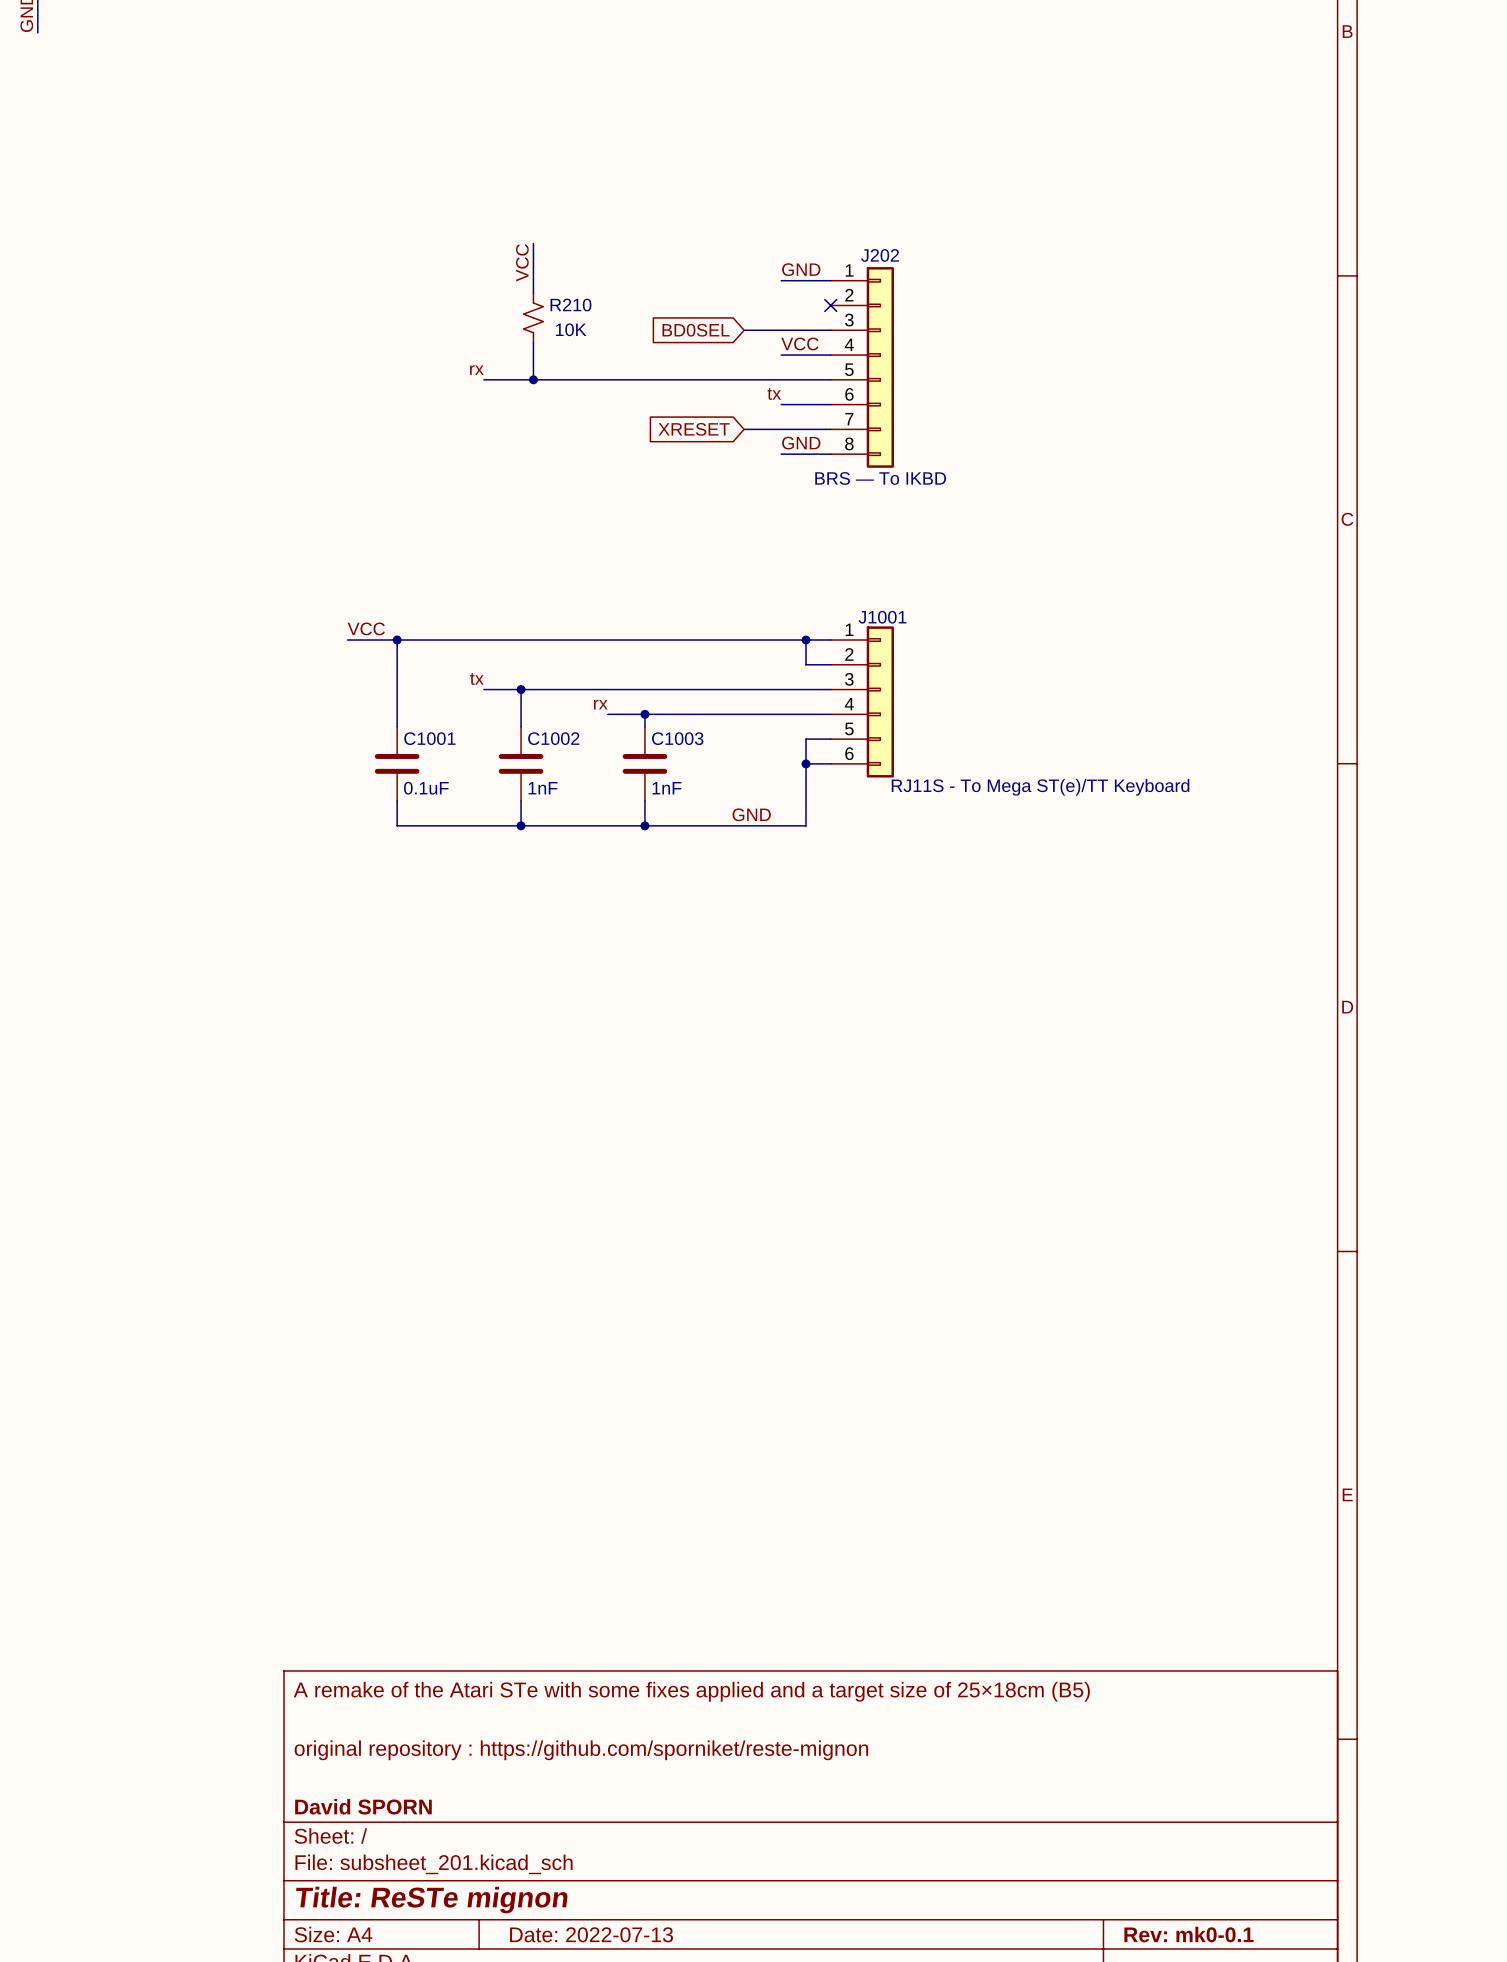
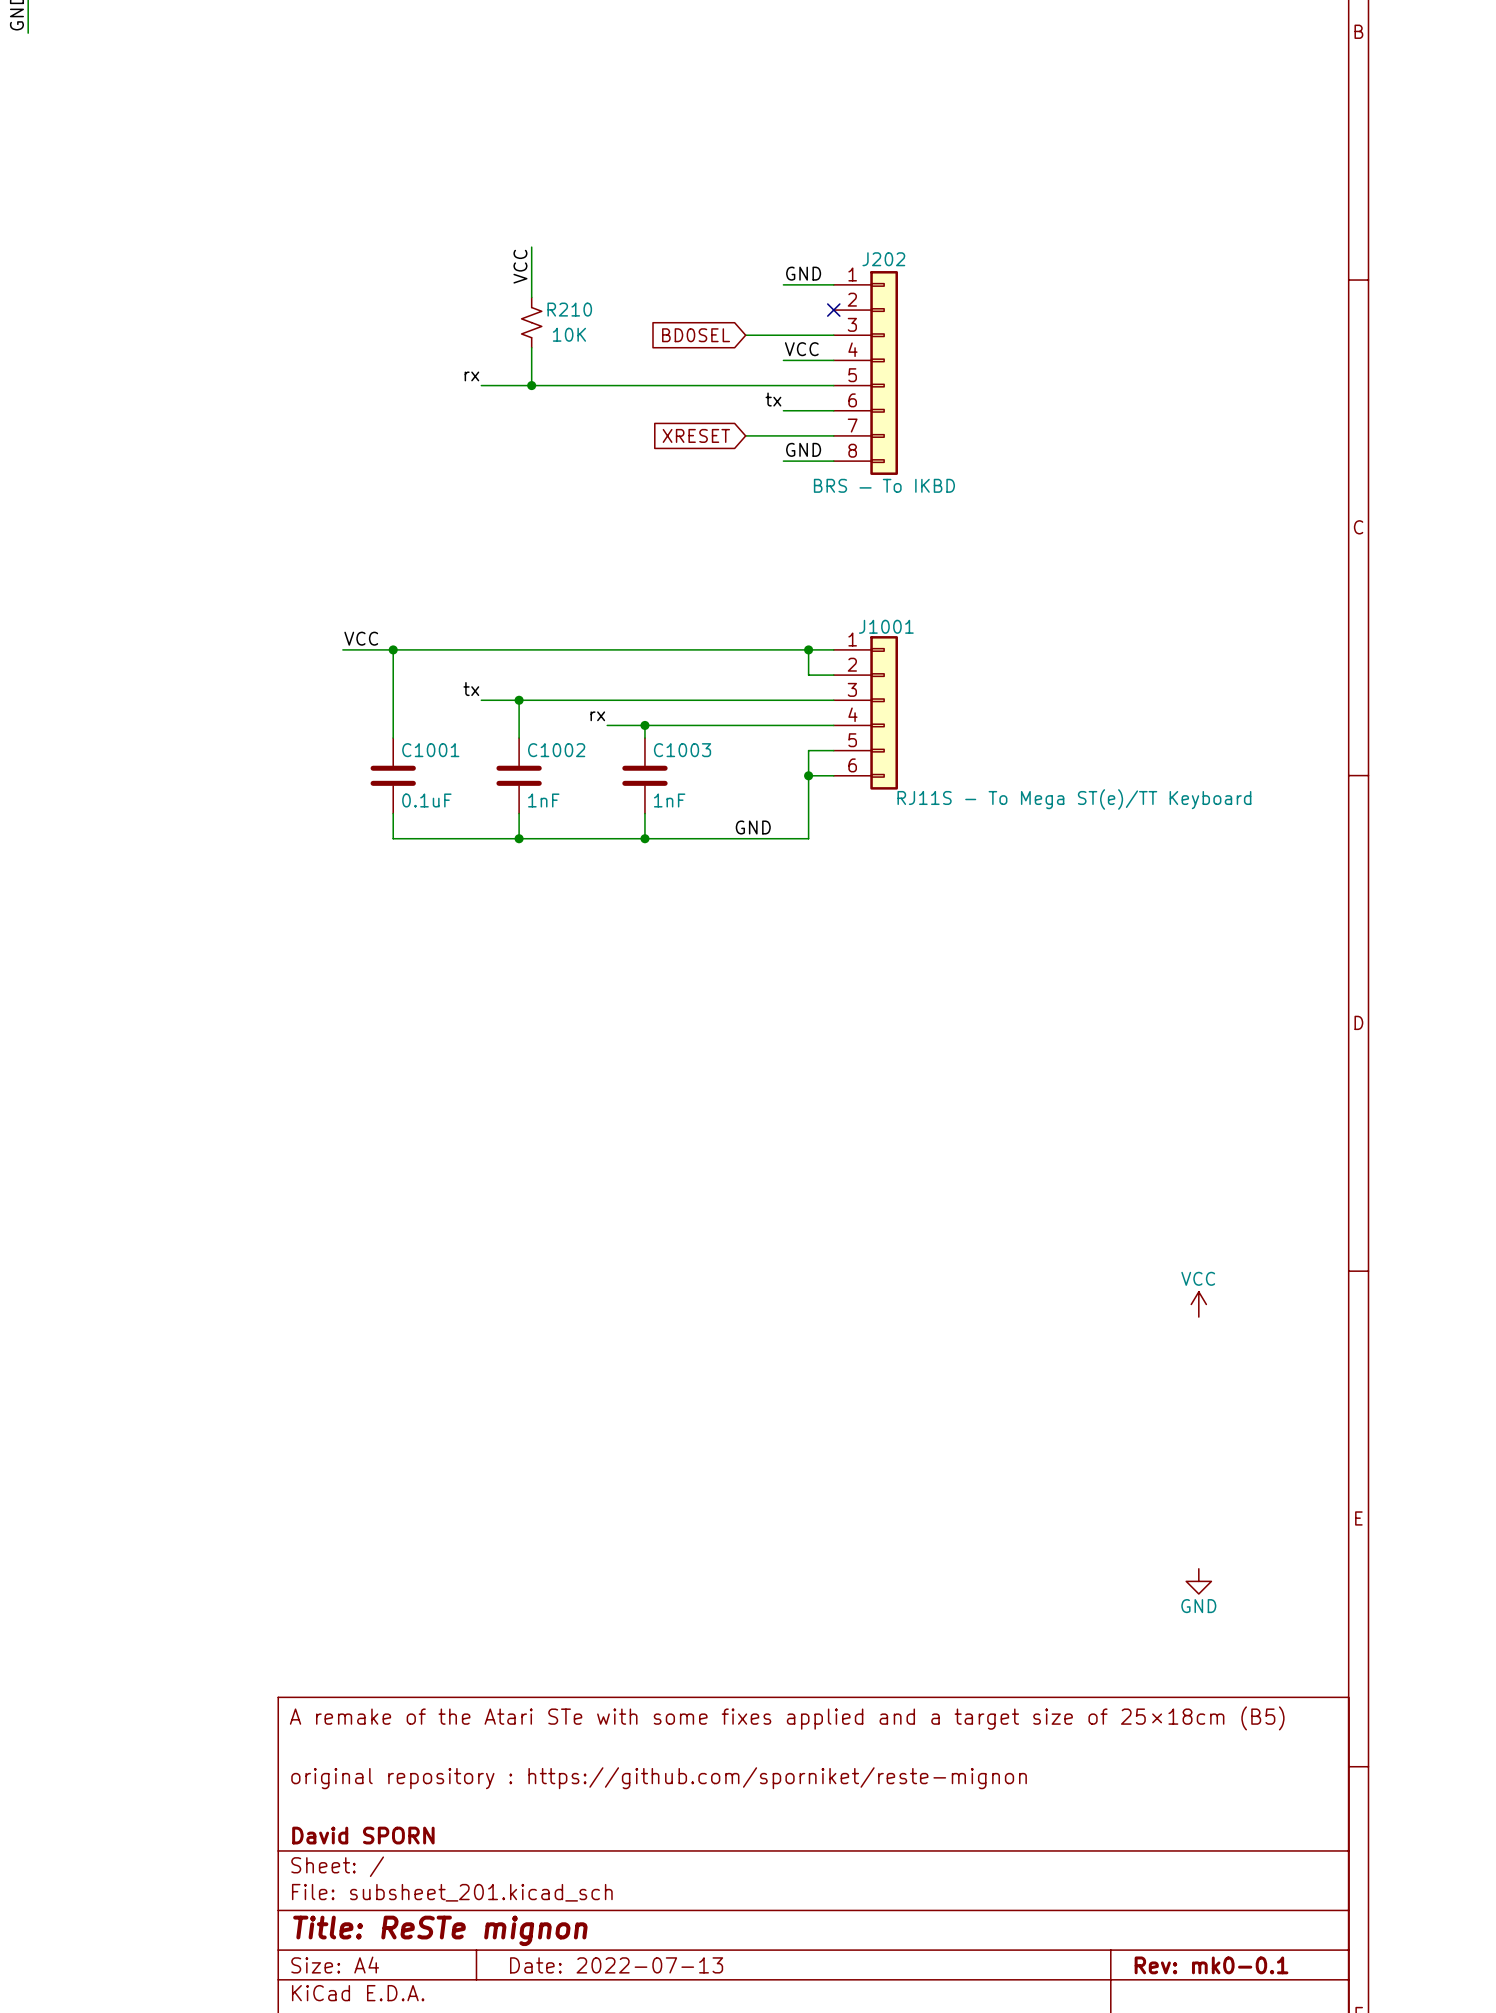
power symbol: none -> VCC (1198, 1304)
power symbol: none -> GND (1198, 1581)

